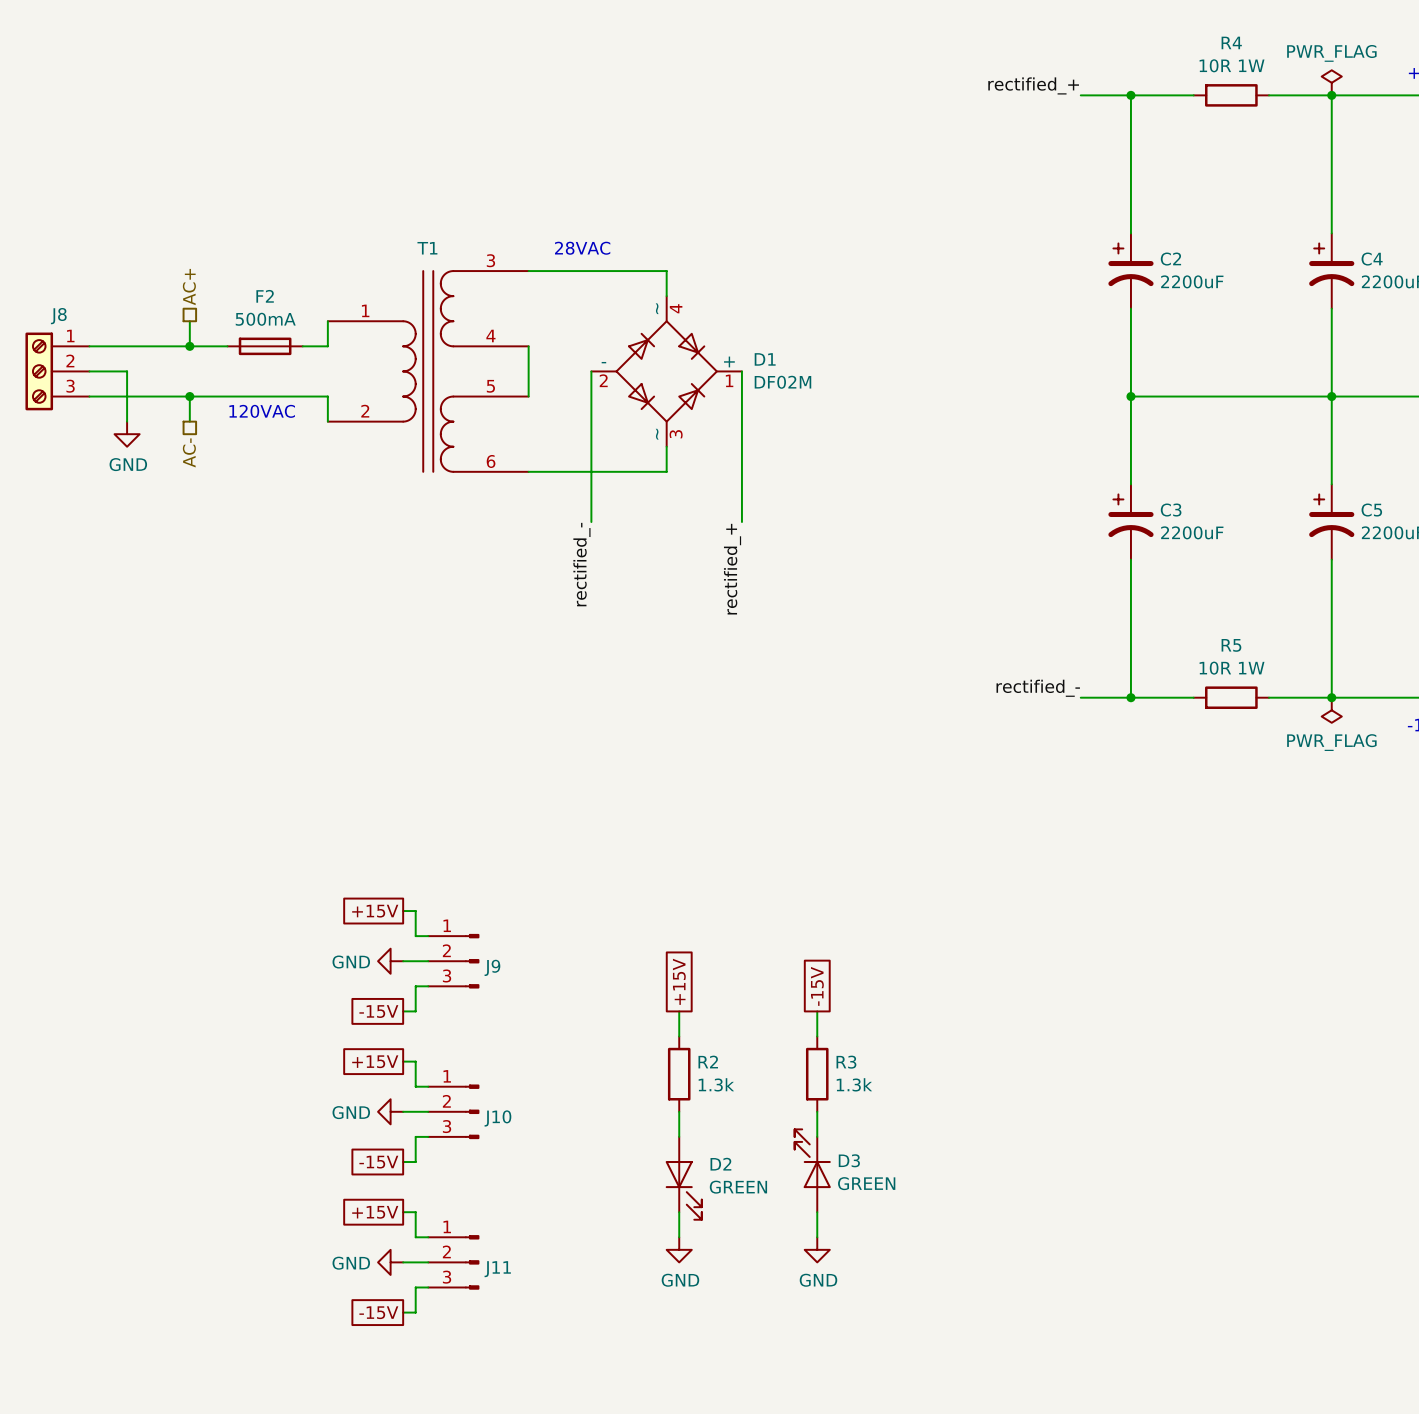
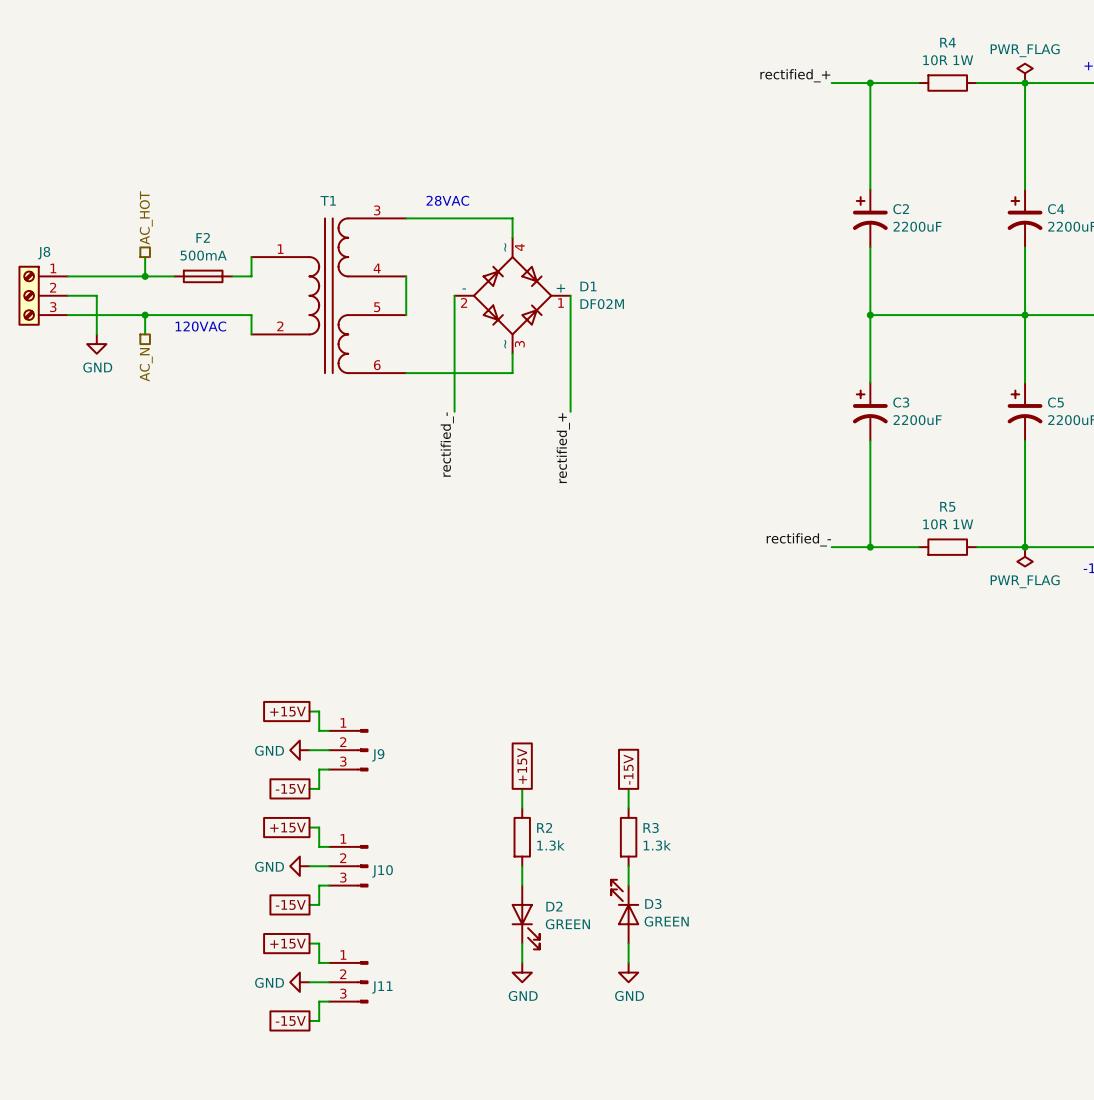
hierarchical label: AC+ (189, 287) -> AC_HOT (146, 217)
hierarchical label: AC- (189, 452) -> AC_N (146, 364)

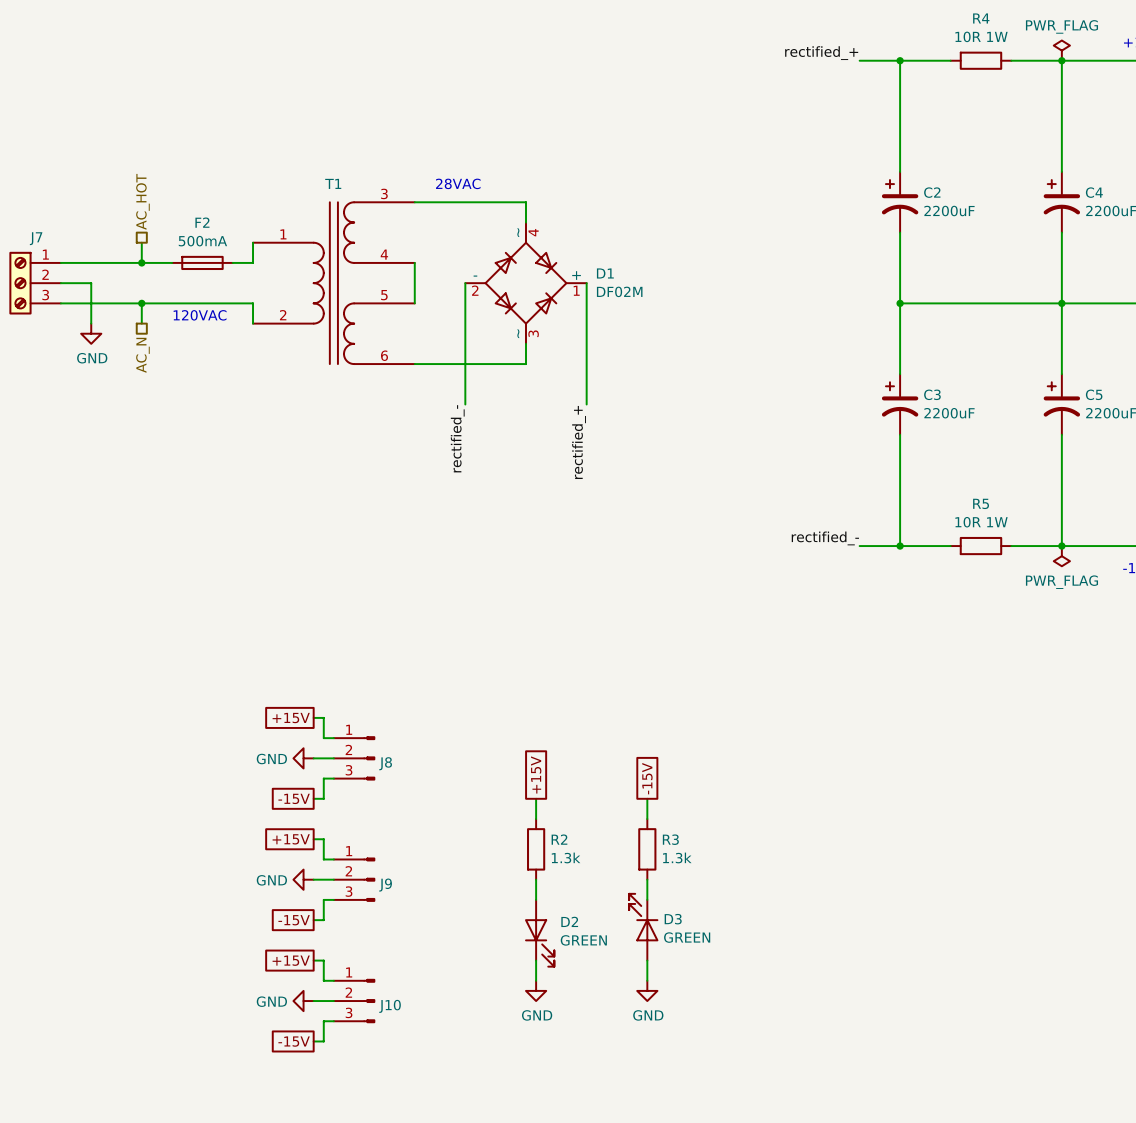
J8 name: J8 (44, 253) -> J7 (36, 238)
J9 name: J9 (378, 755) -> J8 (385, 763)
J10 name: J10 (382, 871) -> J9 (385, 885)
J11 name: J11 (382, 987) -> J10 (390, 1006)

